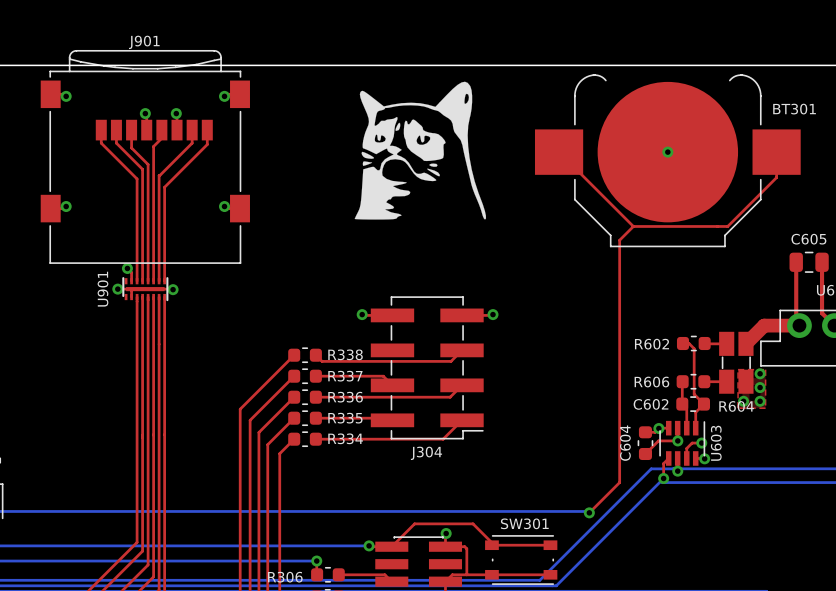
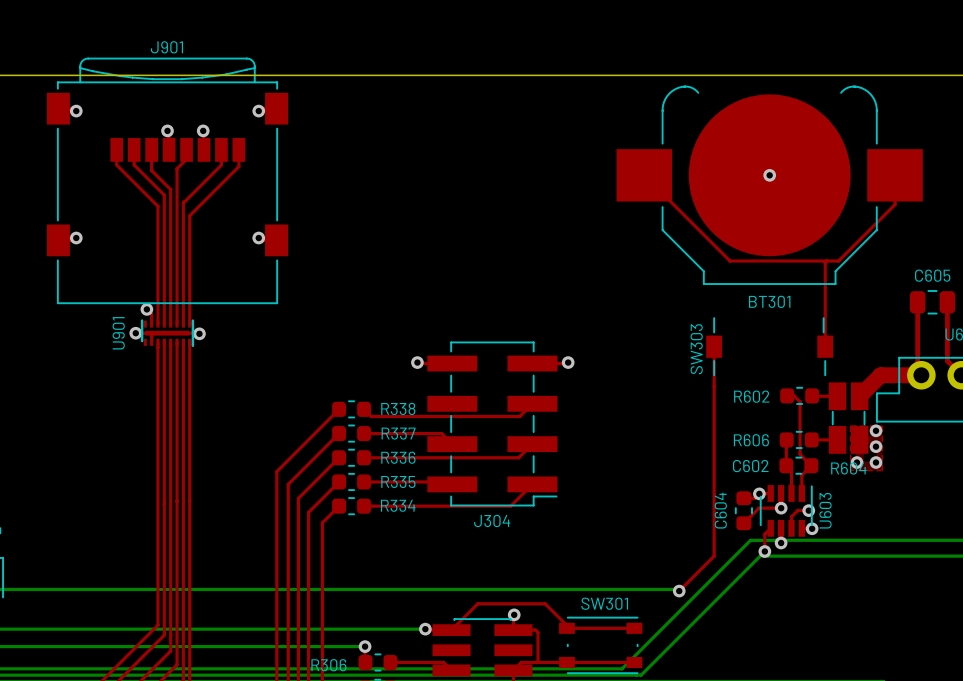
drawing: [354, 81, 487, 220] -> none
BT301 name position: BT301 (794, 109) -> BT301 (769, 301)
top track: (633, 226) (619, 240) (619, 300) -> none
top track: none -> (826, 261) (825, 262) (825, 346)
SW303: none -> (769, 346)

